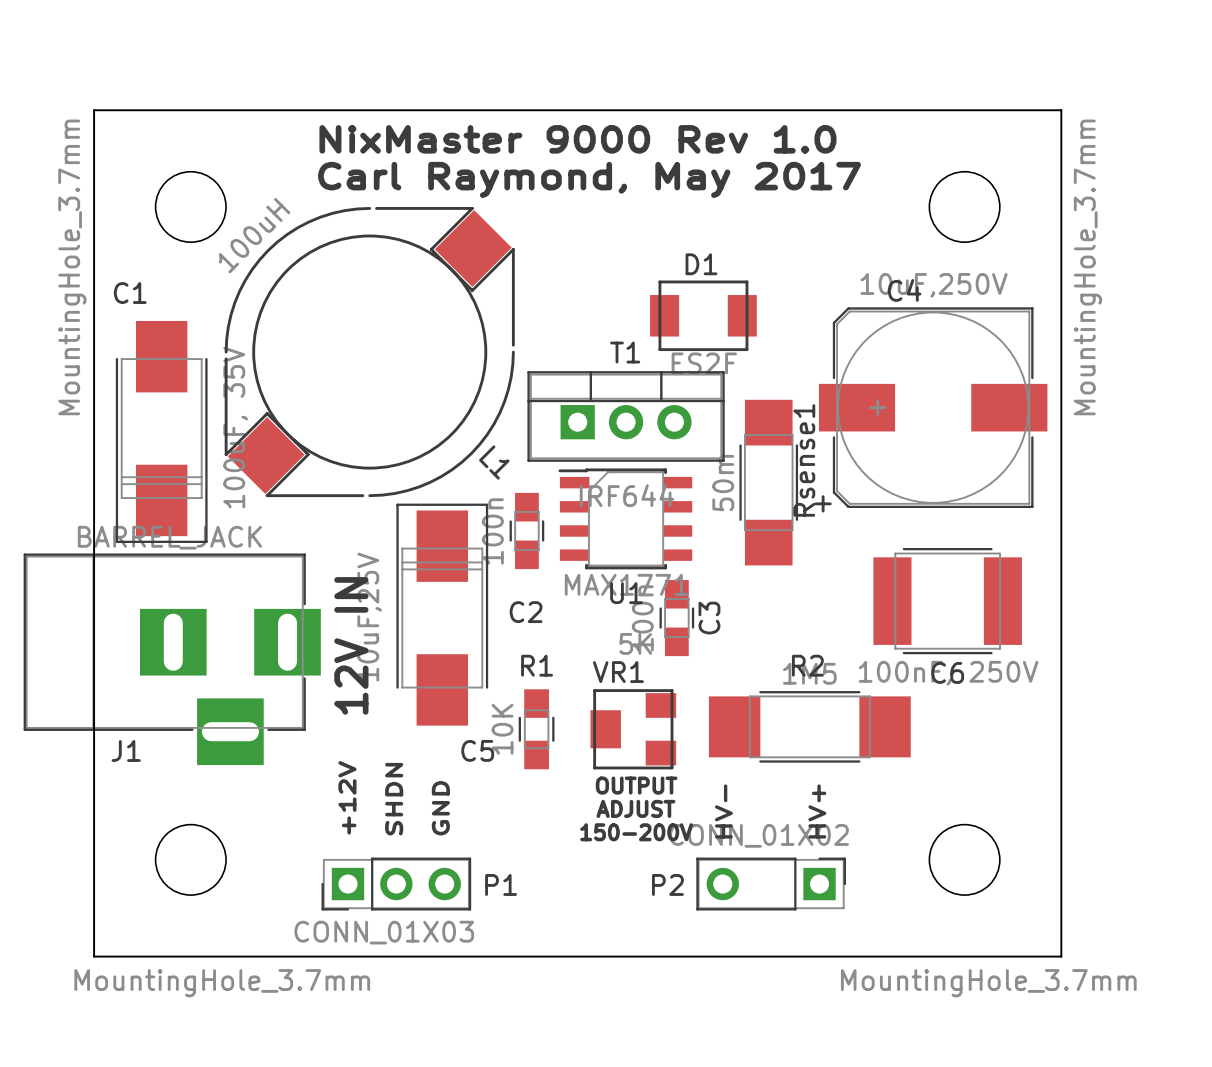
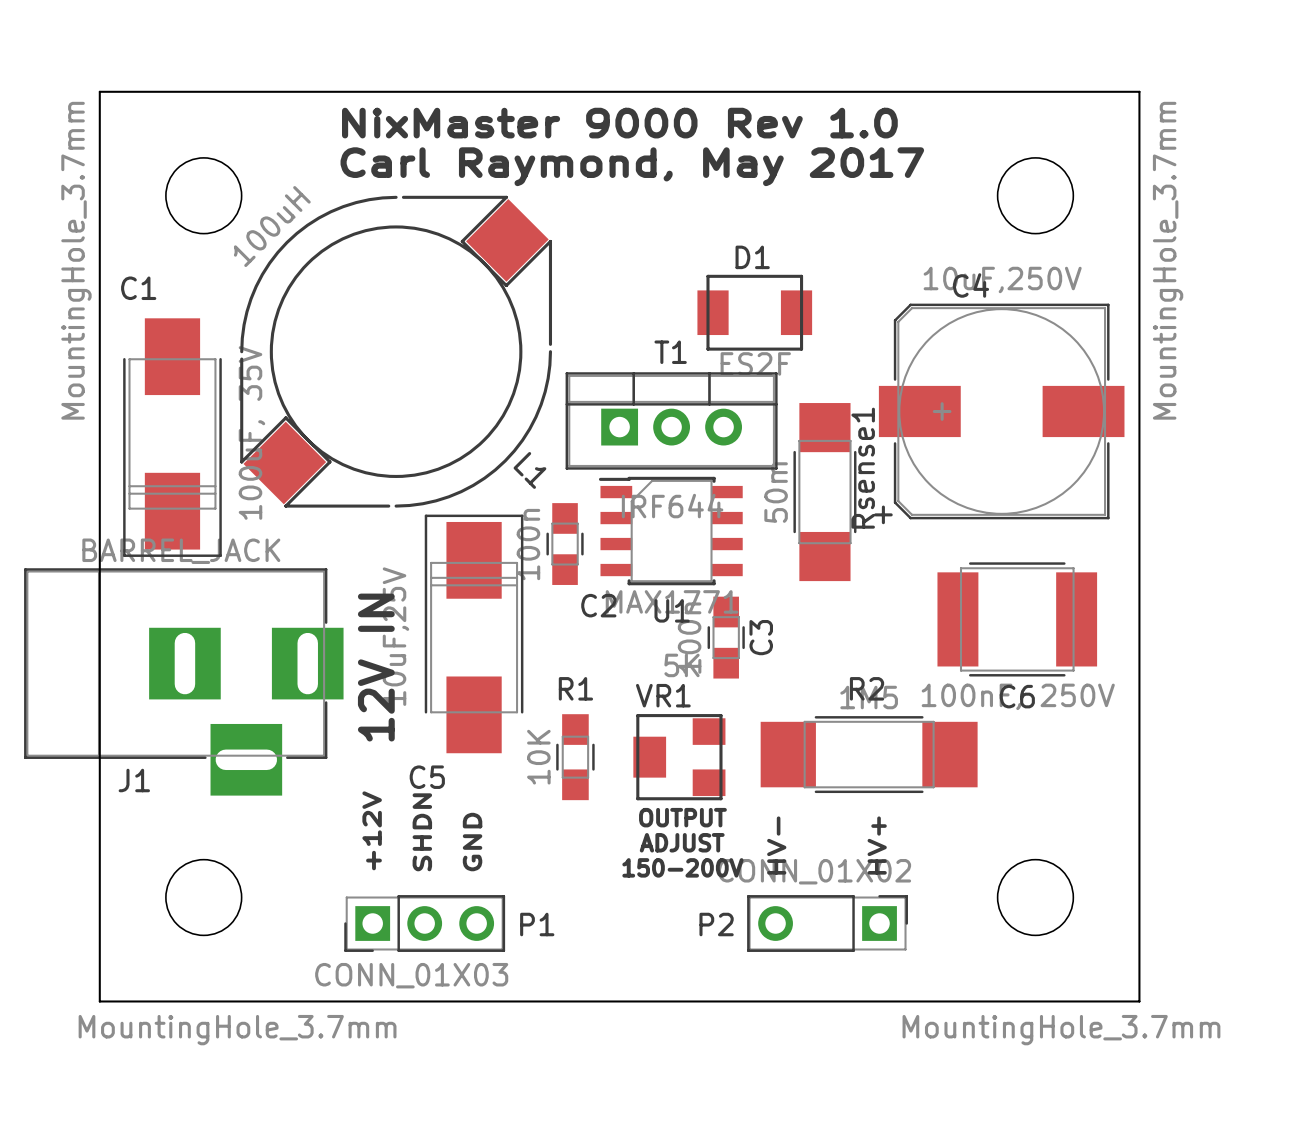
C2 name position: C2 (526, 612) -> C2 (598, 605)
C5 name position: C5 (477, 750) -> C5 (427, 777)

